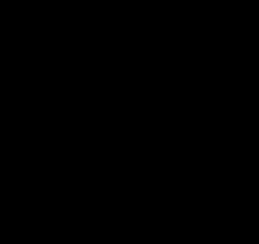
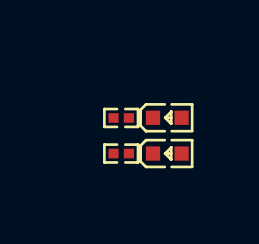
part: none -> (121, 117)
part: none -> (166, 117)
part: none -> (121, 153)
part: none -> (166, 153)

